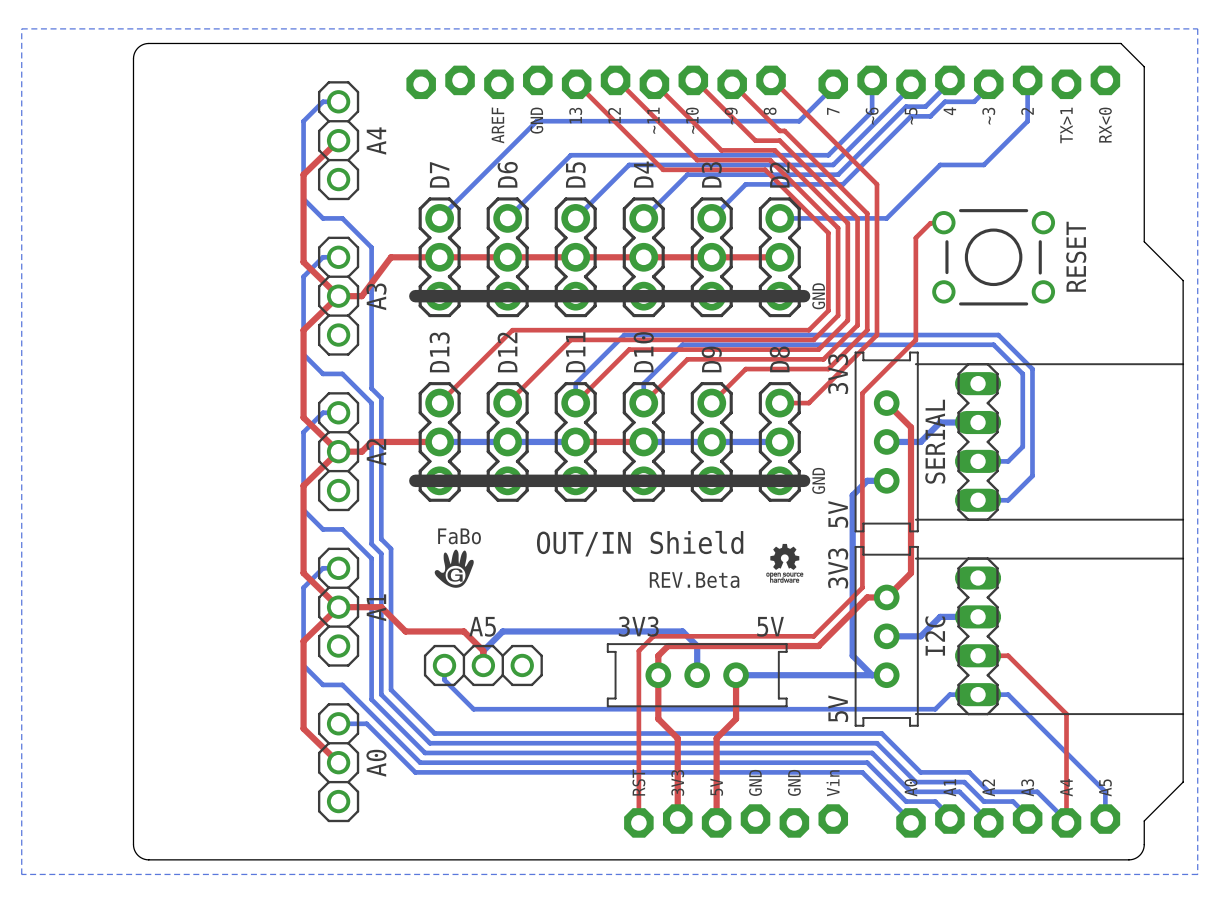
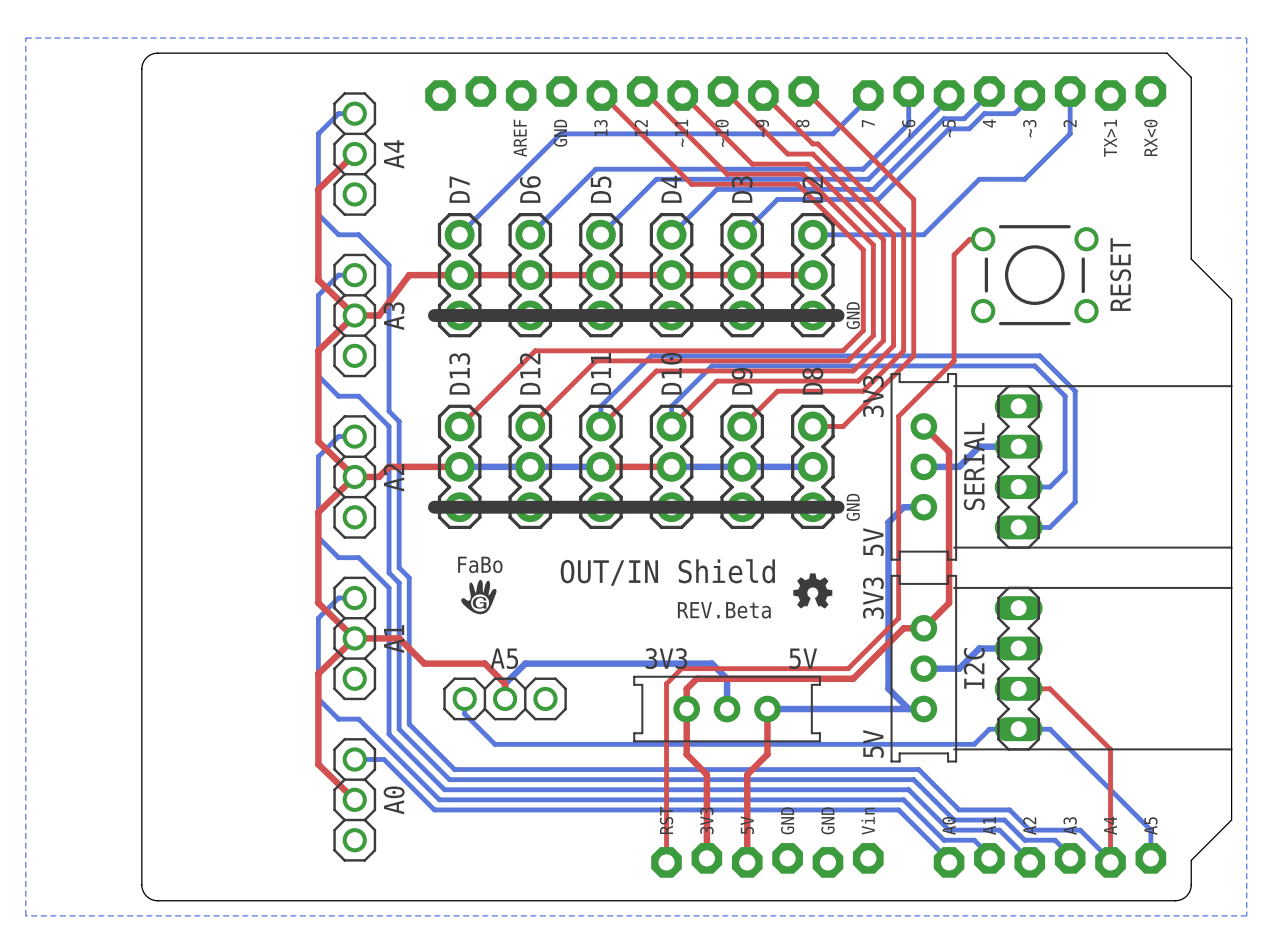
drawing shape: [766, 543, 804, 583] -> [793, 573, 833, 609]
drawing shape: [434, 549, 474, 588] -> [461, 579, 497, 615]

